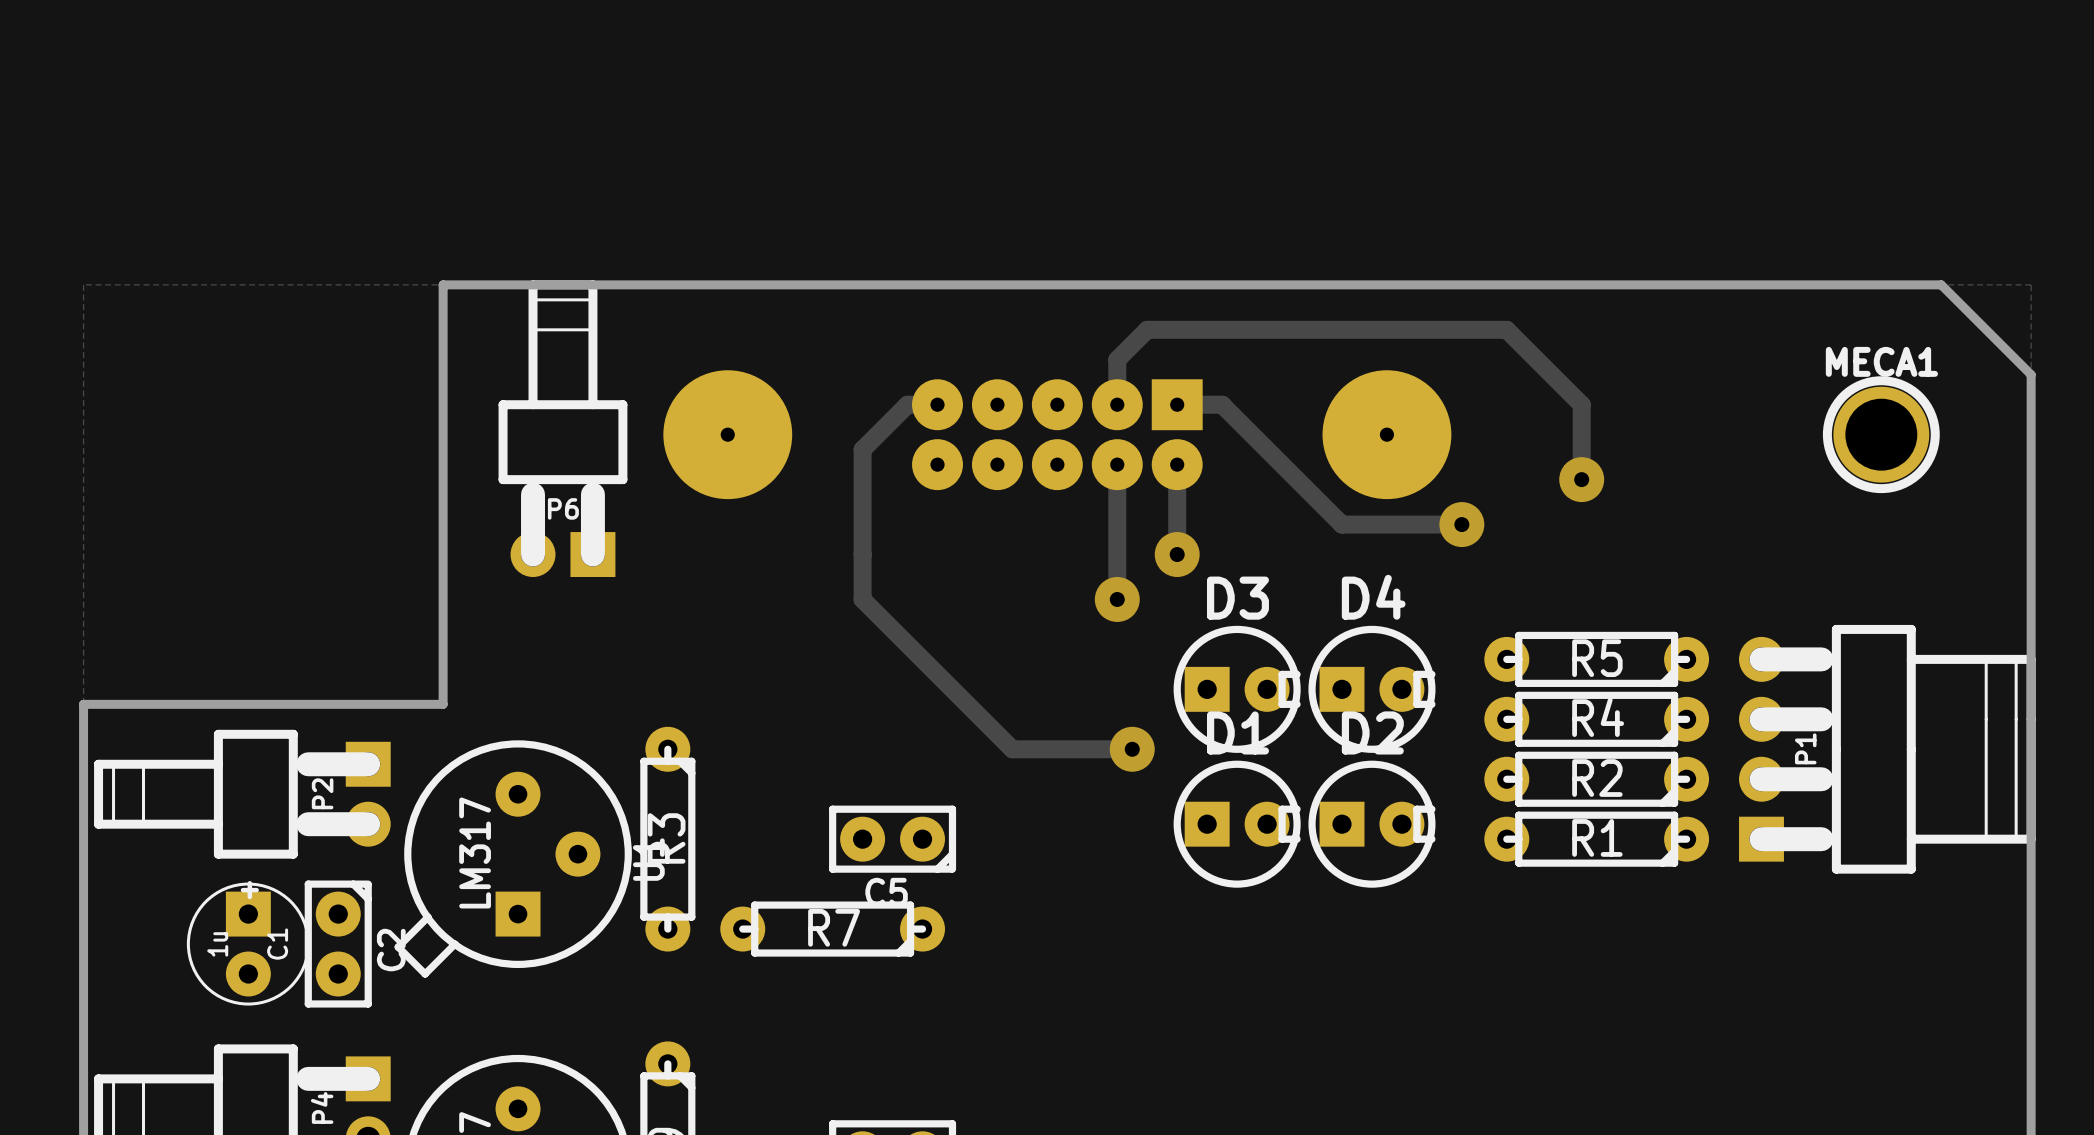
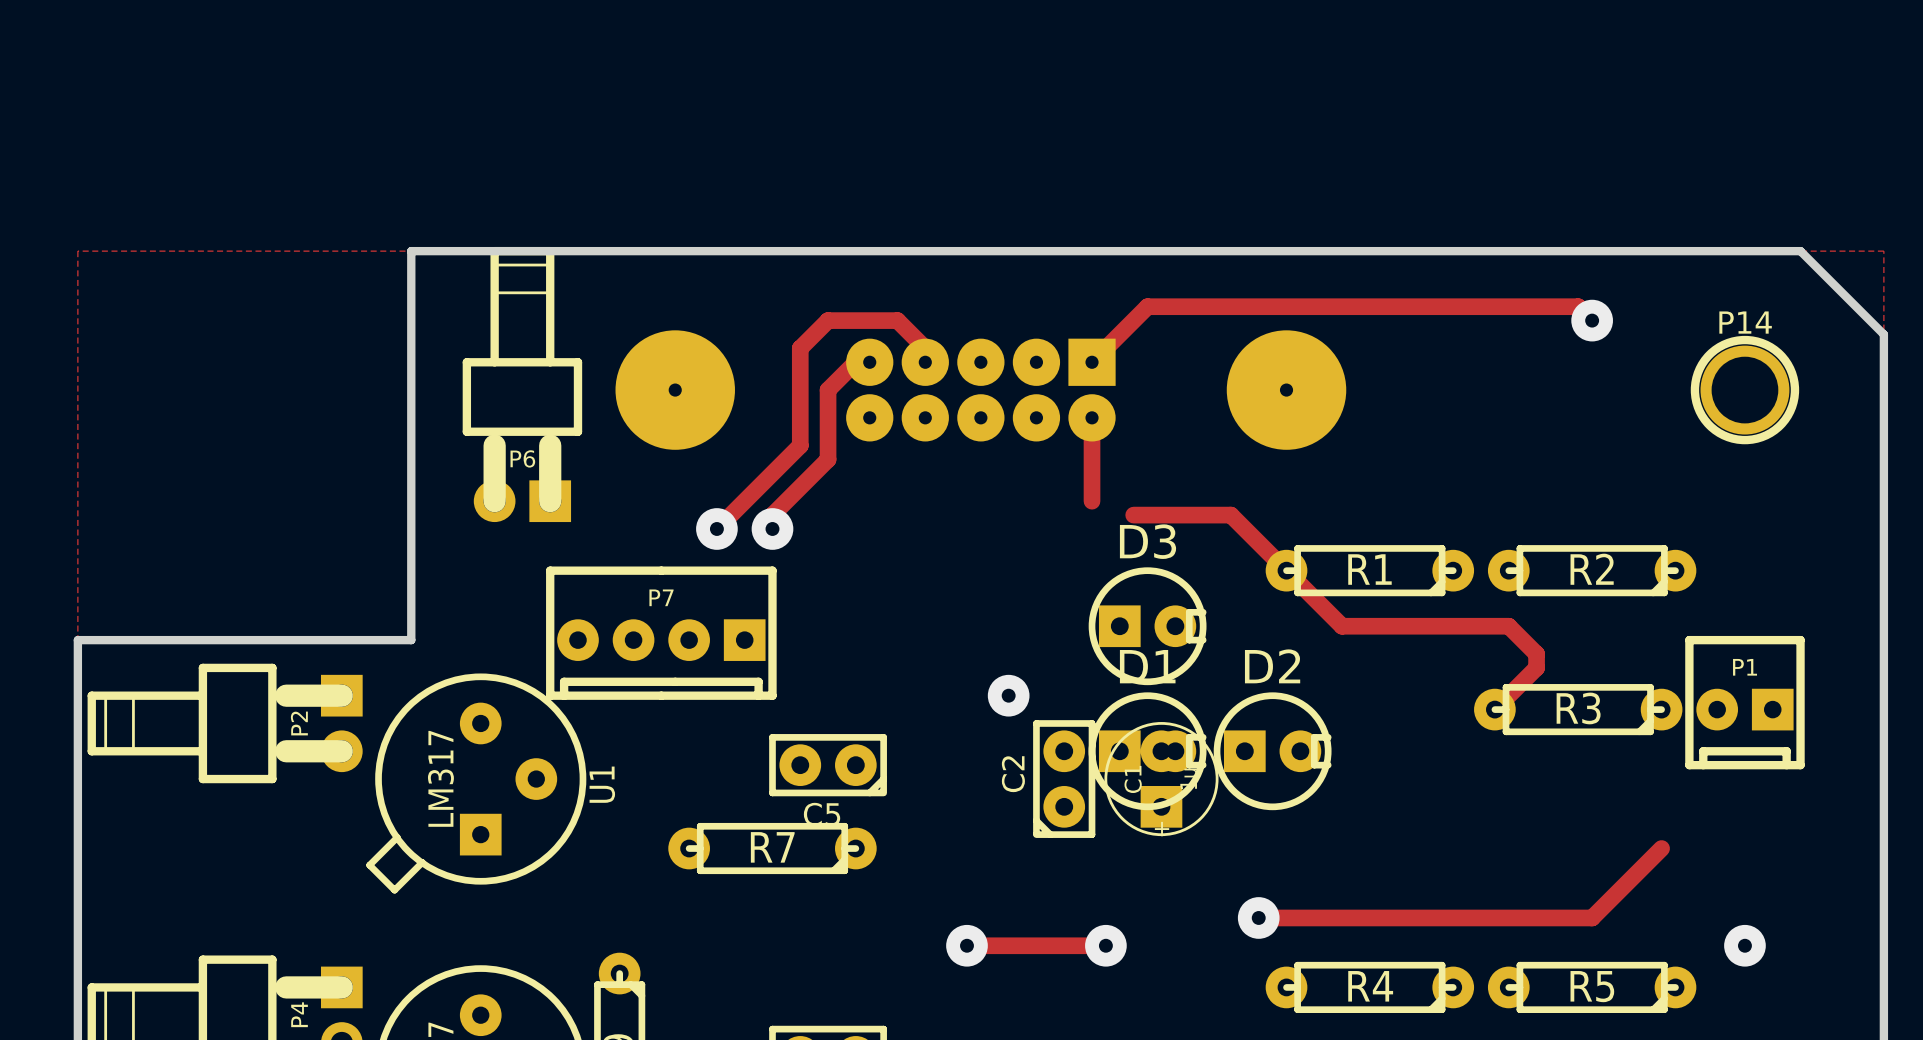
via: none -> (1592, 320)
MECA1 name: MECA1 (1881, 361) -> P14 (1745, 322)
track: (922, 404) (907, 404) (862, 449) -> (925, 362) (925, 348) (897, 320) (828, 320) (800, 348) (800, 403)
track: none -> (855, 362) (828, 390) (828, 459) (772, 515) (772, 528)
track: (1117, 404) (1117, 359) (1147, 329) (1506, 329) (1581, 404) (1581, 479) -> none
track: (1177, 404) (1222, 404) (1342, 524) (1461, 524) -> (1092, 362) (1147, 306) (1578, 306) (1592, 320)
track: (1117, 464) (1117, 599) -> none
via: (1581, 479) -> none
track: (862, 494) (862, 599) (1012, 749) (1132, 749) -> (800, 445) (716, 528)
via: (1461, 524) -> none
via: (1177, 554) -> none
track: none -> (1133, 515) (1230, 515) (1342, 626) (1508, 626) (1536, 654) (1536, 667) (1494, 709)
via: none -> (716, 528)
via: none -> (772, 528)
via: (1117, 599) -> none
P1 footprint: [1739, 624, 2036, 874] -> [1685, 635, 1805, 770]
R5 position: (1596, 659) -> (1592, 987)
D4: (1371, 689) -> none
P7: none -> (661, 633)
R4 position: (1596, 719) -> (1369, 987)
P1 name position: P1 (1805, 748) -> P1 (1745, 667)
via position: (1132, 749) -> (1008, 695)
R2 position: (1596, 779) -> (1592, 570)
R3 rotation: 0° (667, 839) -> 90° clockwise (1578, 709)
R3 position: (667, 839) -> (1578, 709)
R1 position: (1596, 839) -> (1369, 570)
track: none -> (1661, 848) (1592, 917) (1258, 917)
C1 rotation: 0° (248, 944) -> 180° (1161, 779)
C1 position: (248, 944) -> (1161, 779)
C2 rotation: 0° (338, 944) -> 180° (1064, 779)
C2 position: (338, 944) -> (1064, 779)
via: none -> (1258, 917)
track: none -> (966, 945) (1105, 945)
via: none -> (966, 945)
via: none -> (1105, 945)
via: none -> (1744, 945)

